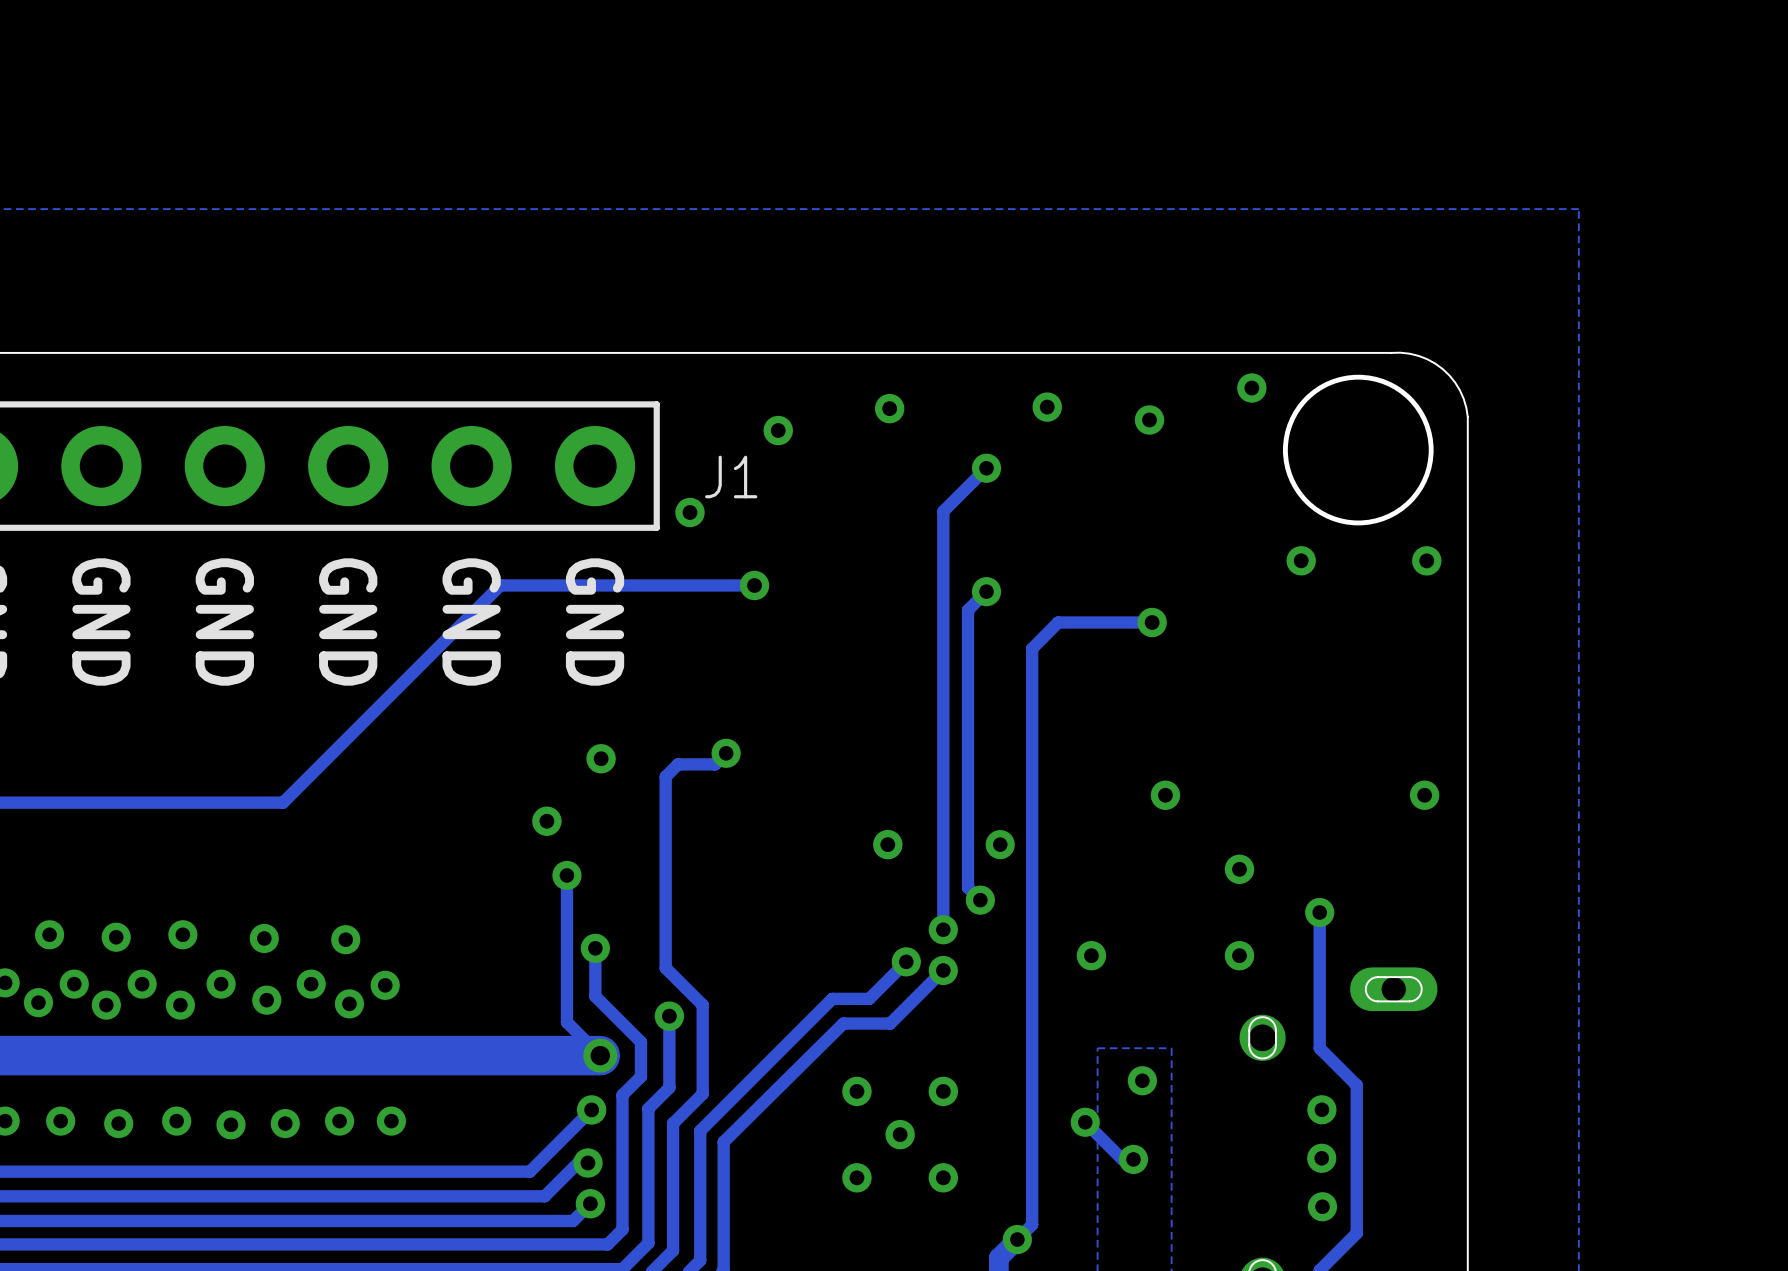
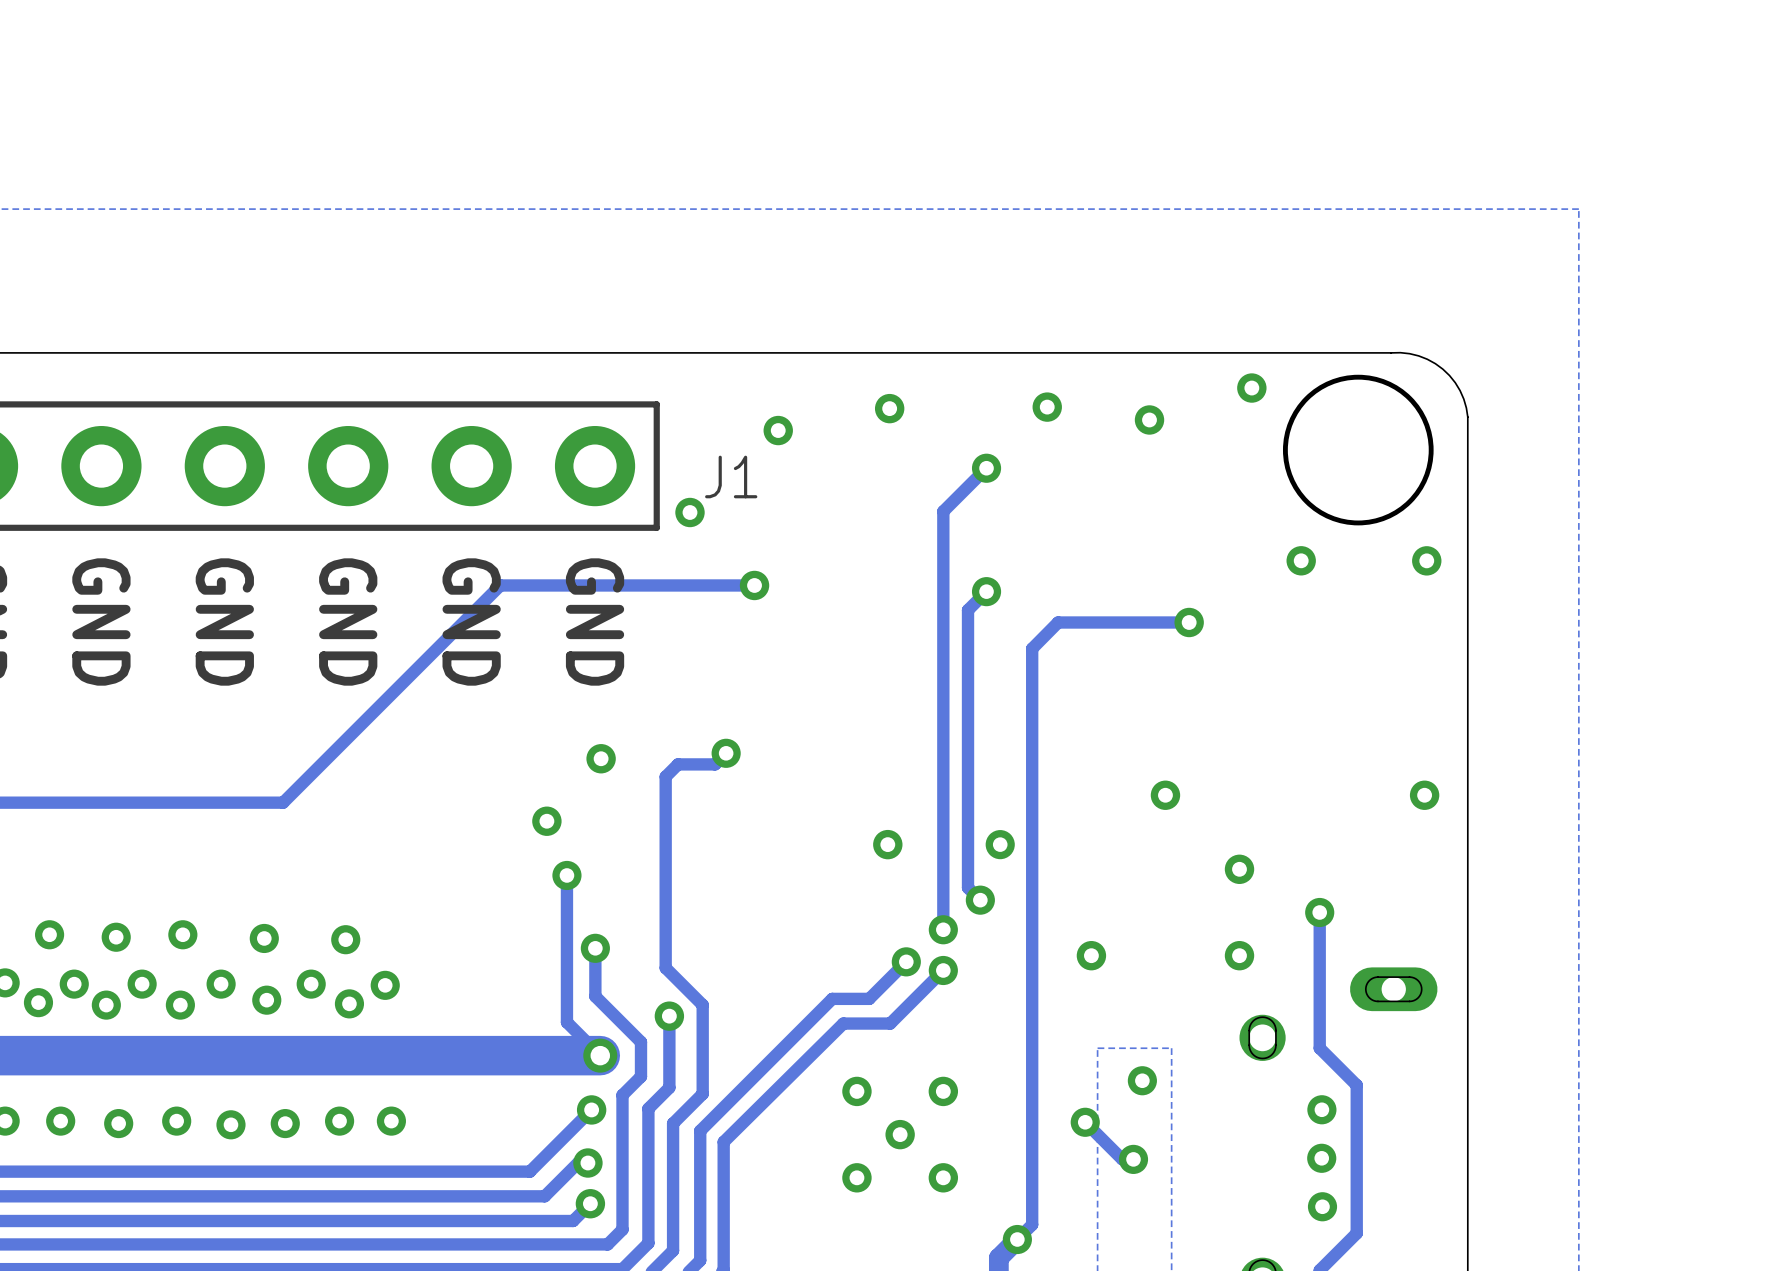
via position: (1152, 622) -> (1189, 622)
track: none -> (1189, 622) (1152, 622)

